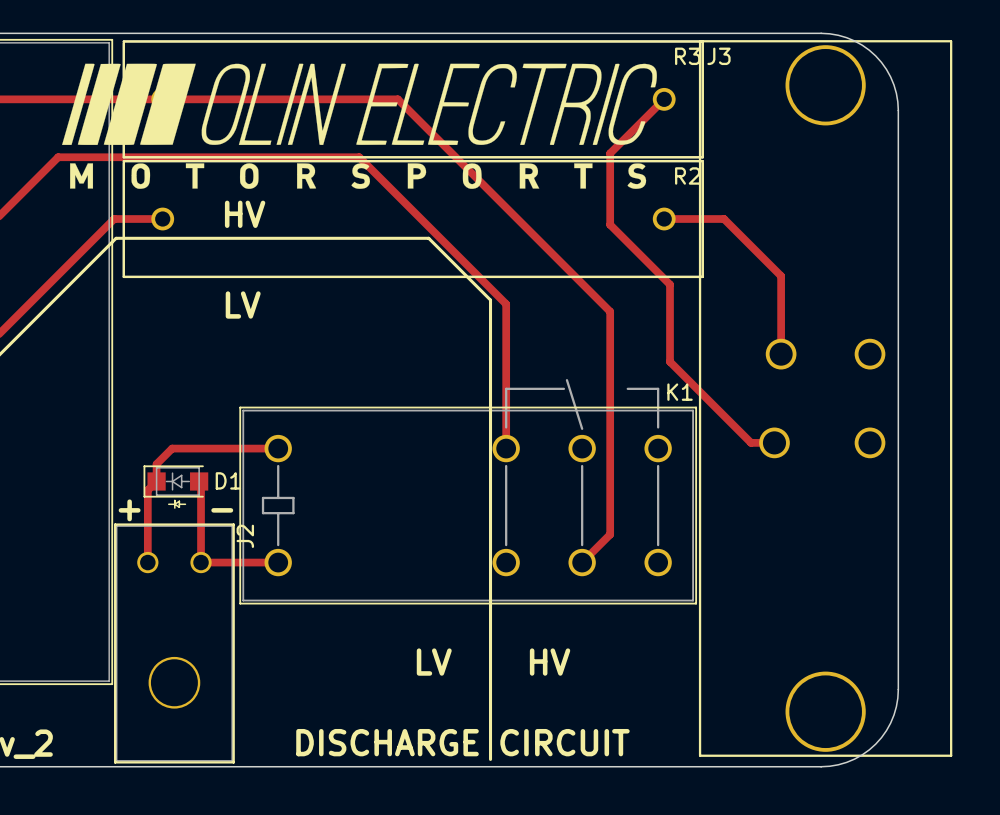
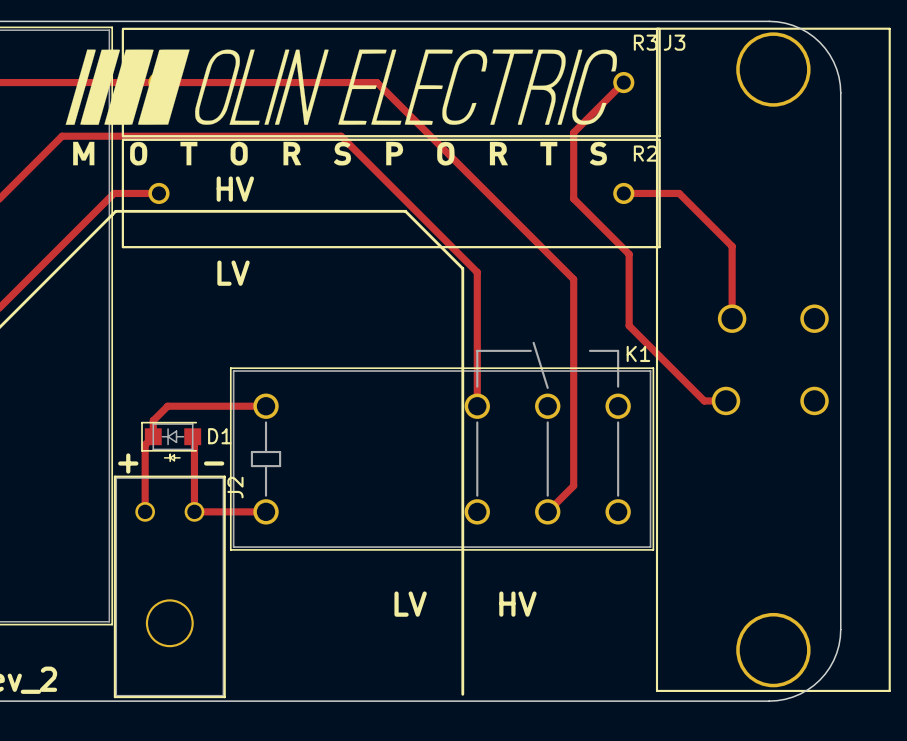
text: DISCHARGE CIRCUIT (462, 742) -> none

